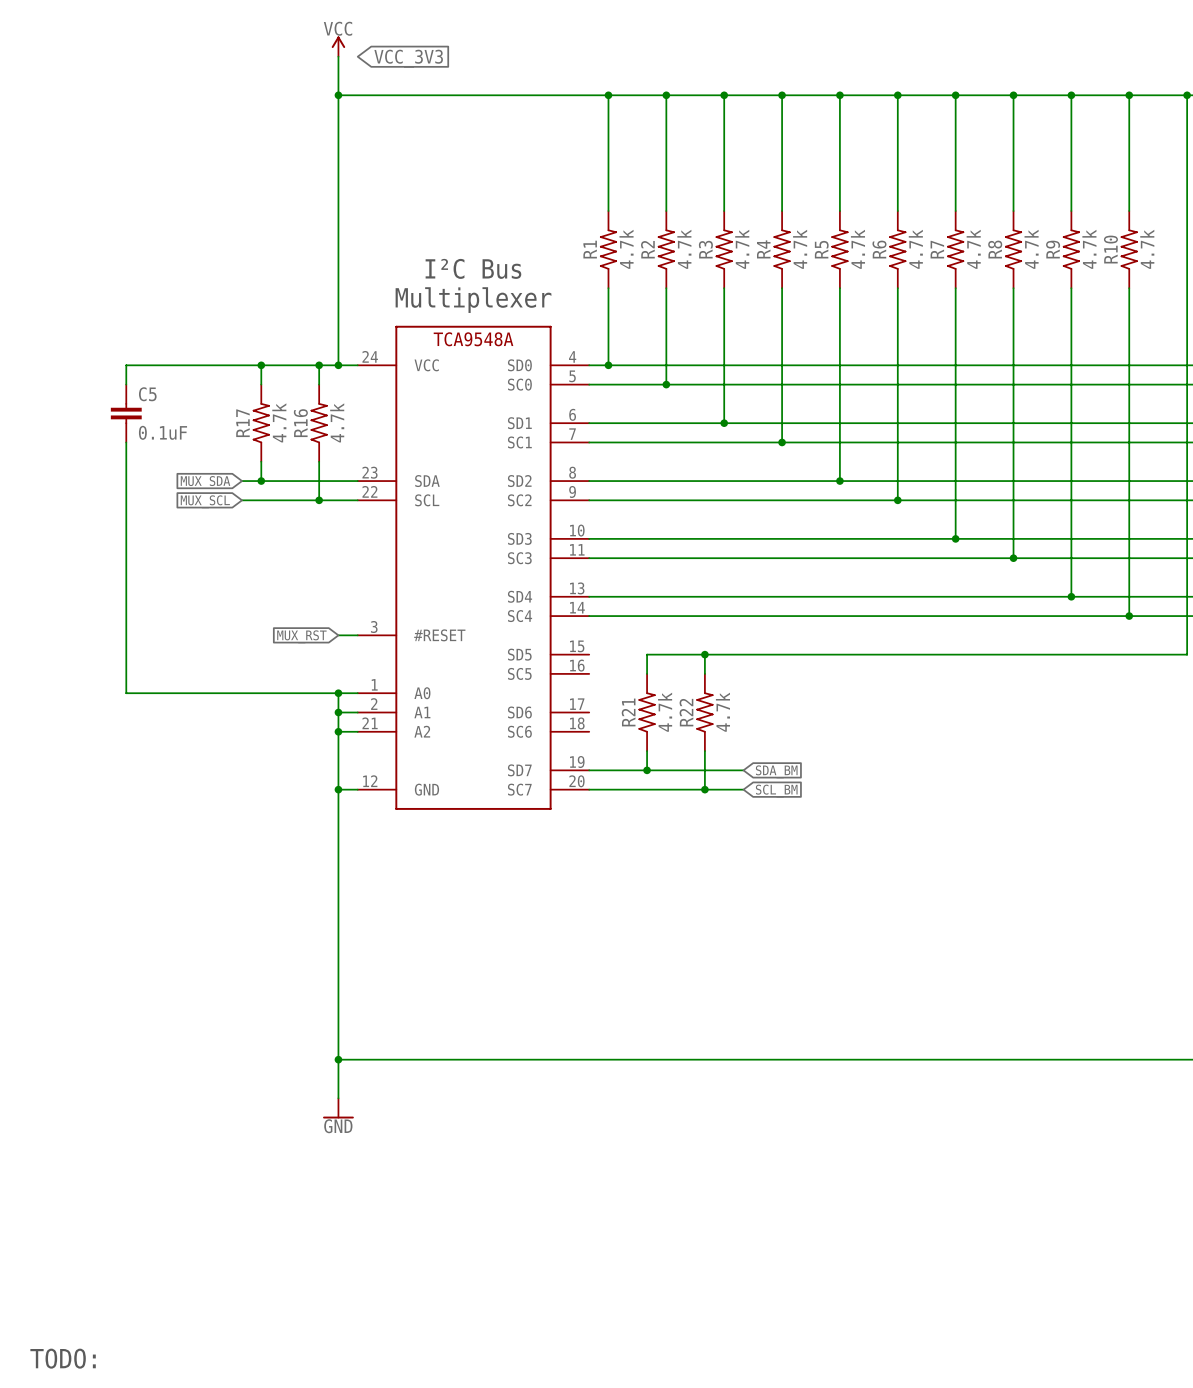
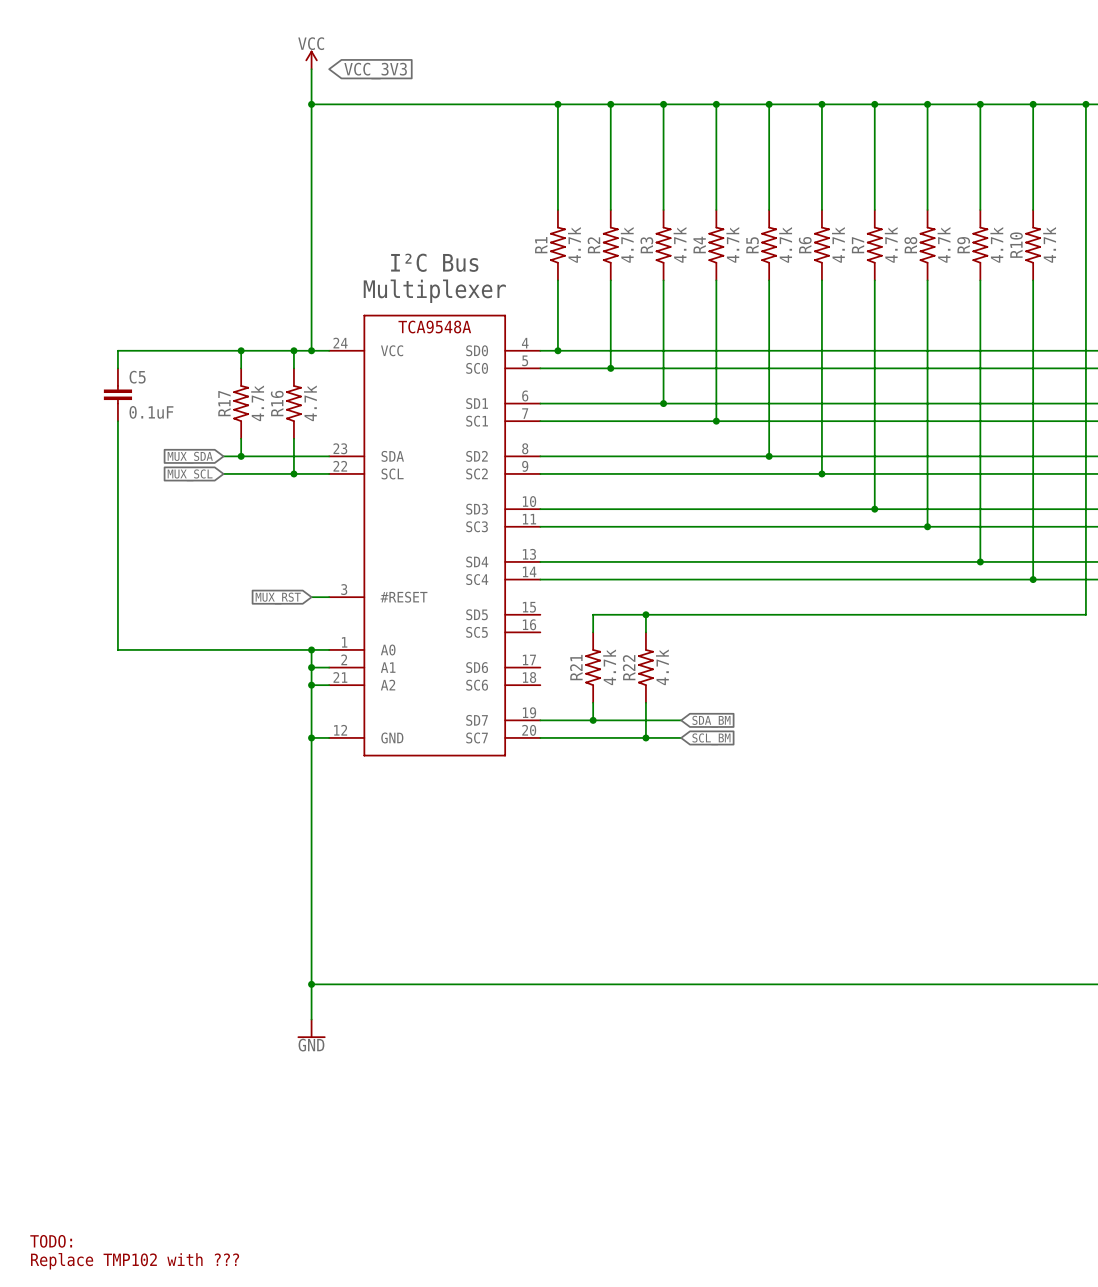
text: none -> TODO: (51, 1241)
text: TODO: (63, 1358) -> Replace TMP102 with ??? (135, 1261)

